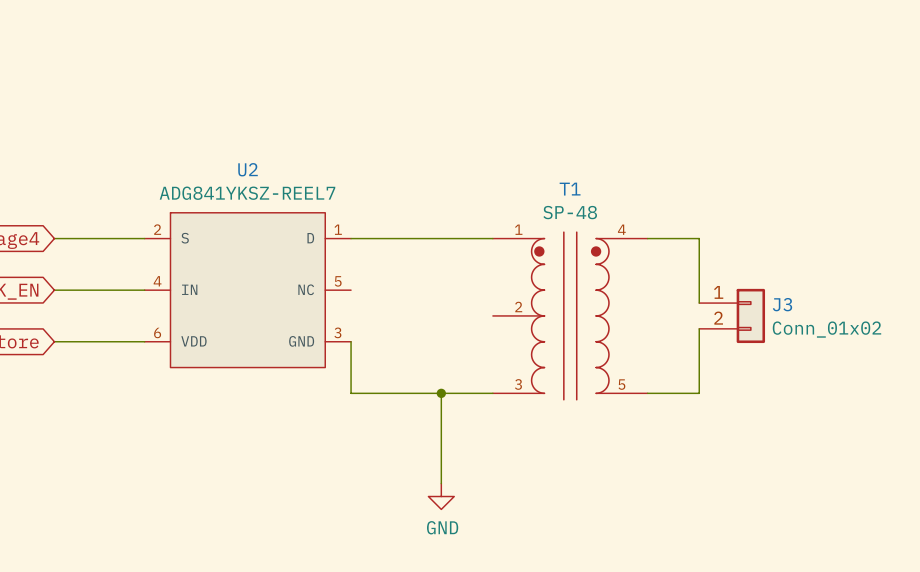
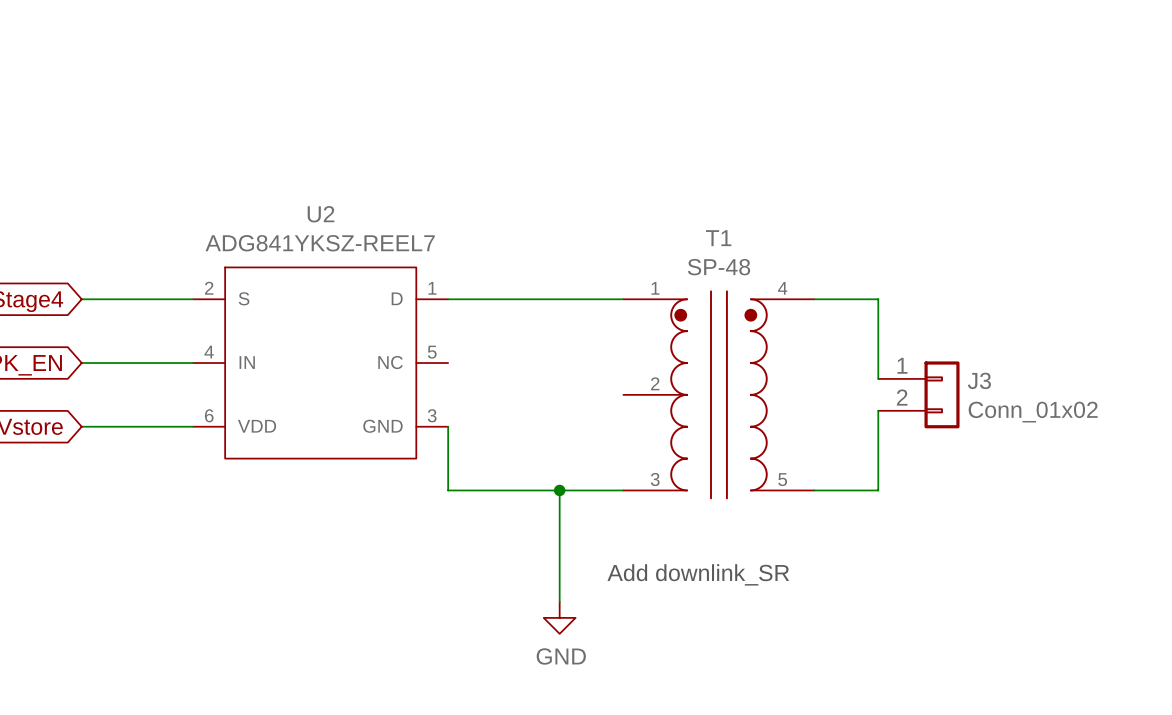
text: none -> Add downlink_SR (698, 574)

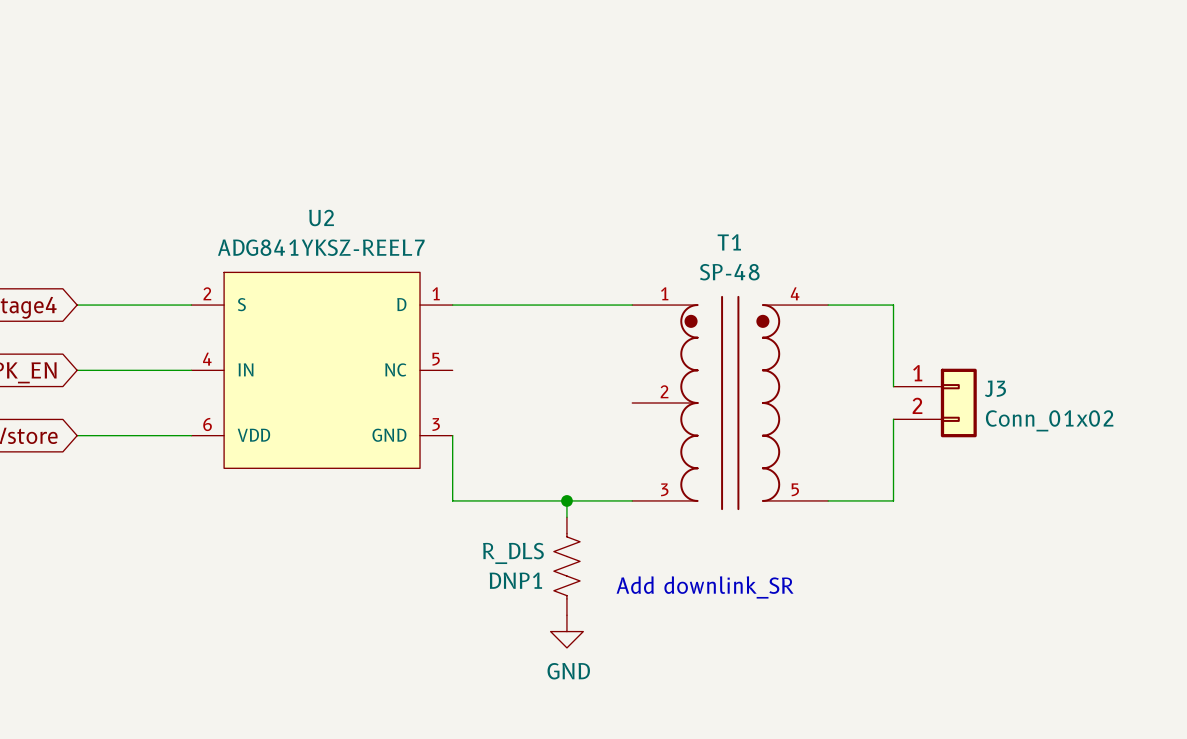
DNP1: none -> R_DLS (566, 566)

